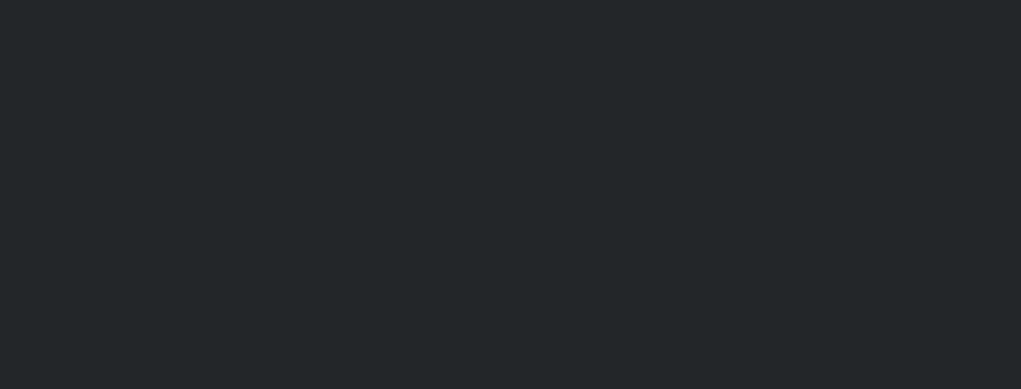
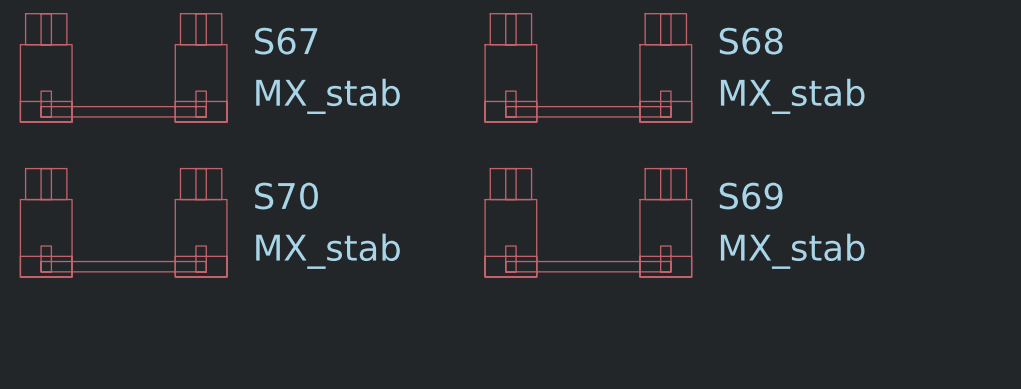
S67: none -> MX_stab (123, 67)
S68: none -> MX_stab (588, 67)
S70: none -> MX_stab (123, 222)
S69: none -> MX_stab (588, 222)

